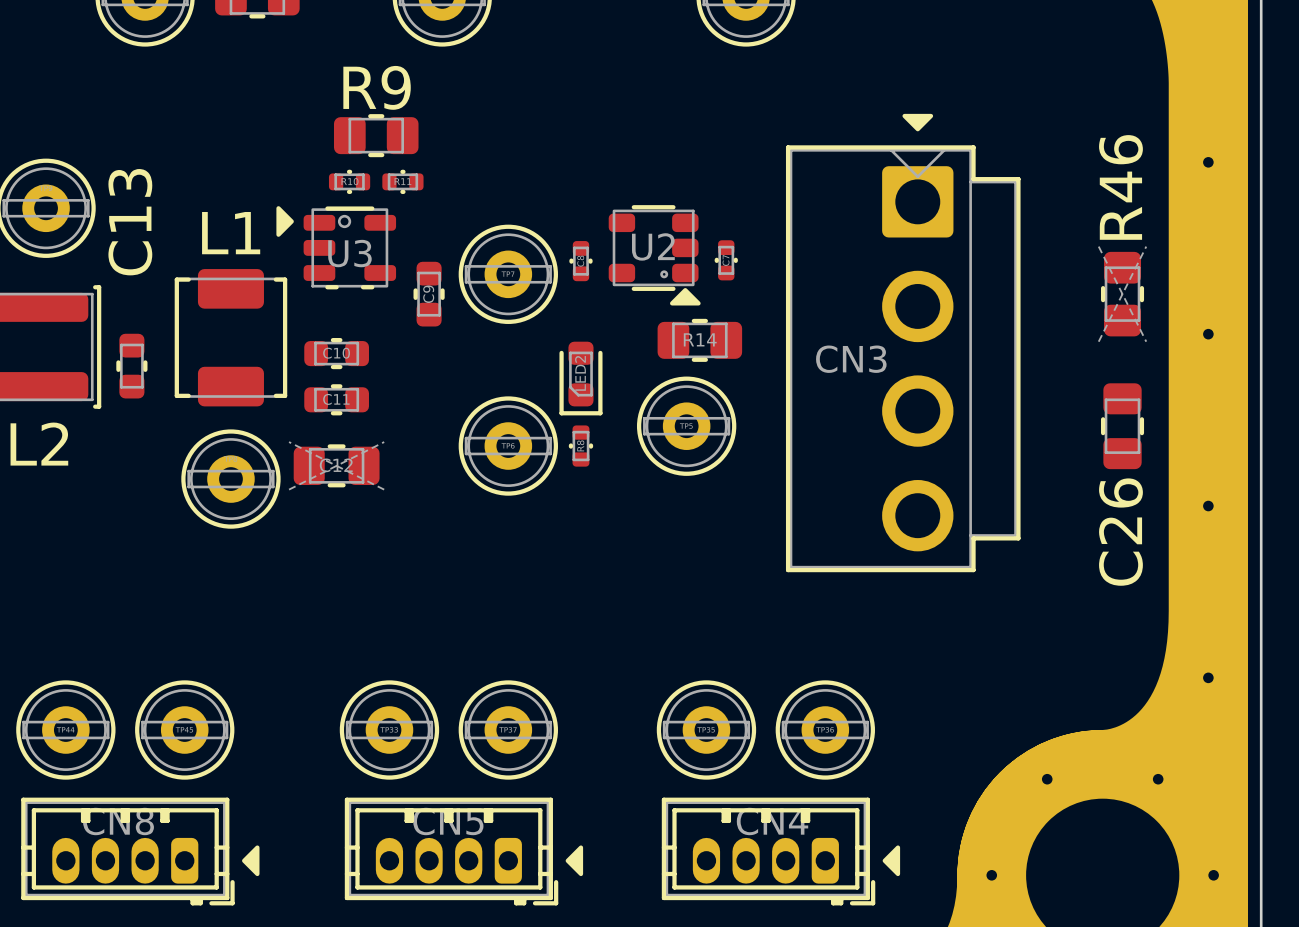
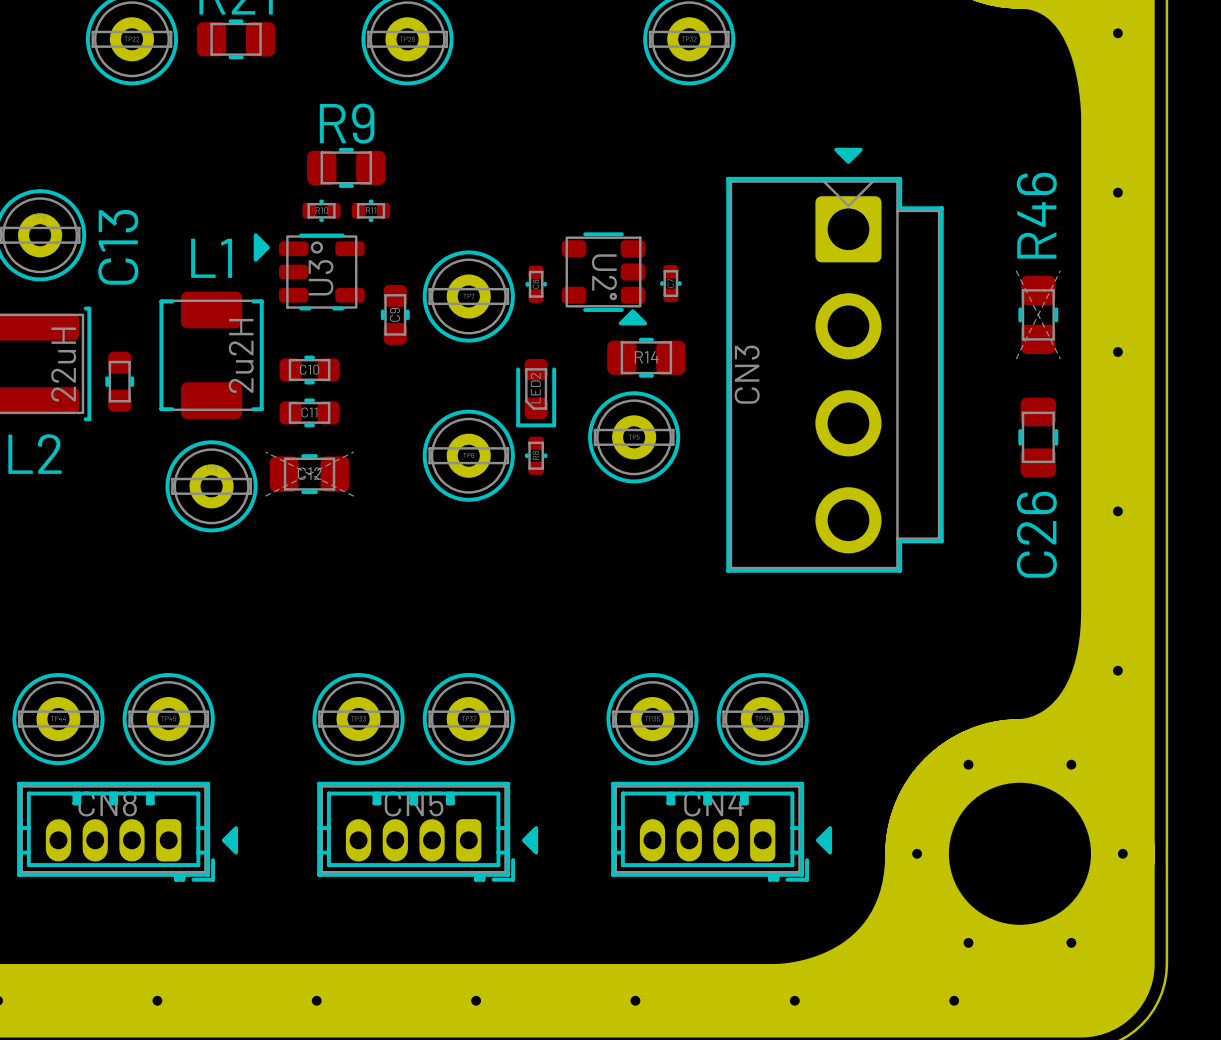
U2 name rotation: 0° (653, 246) -> 90° clockwise (604, 272)
U3 name rotation: 0° (349, 253) -> 90° counterclockwise (321, 277)
L1 value: none -> 2u2H (241, 355)
L2 value: none -> 22uH (63, 364)
CN3 name rotation: 0° (851, 359) -> 90° counterclockwise (747, 374)

